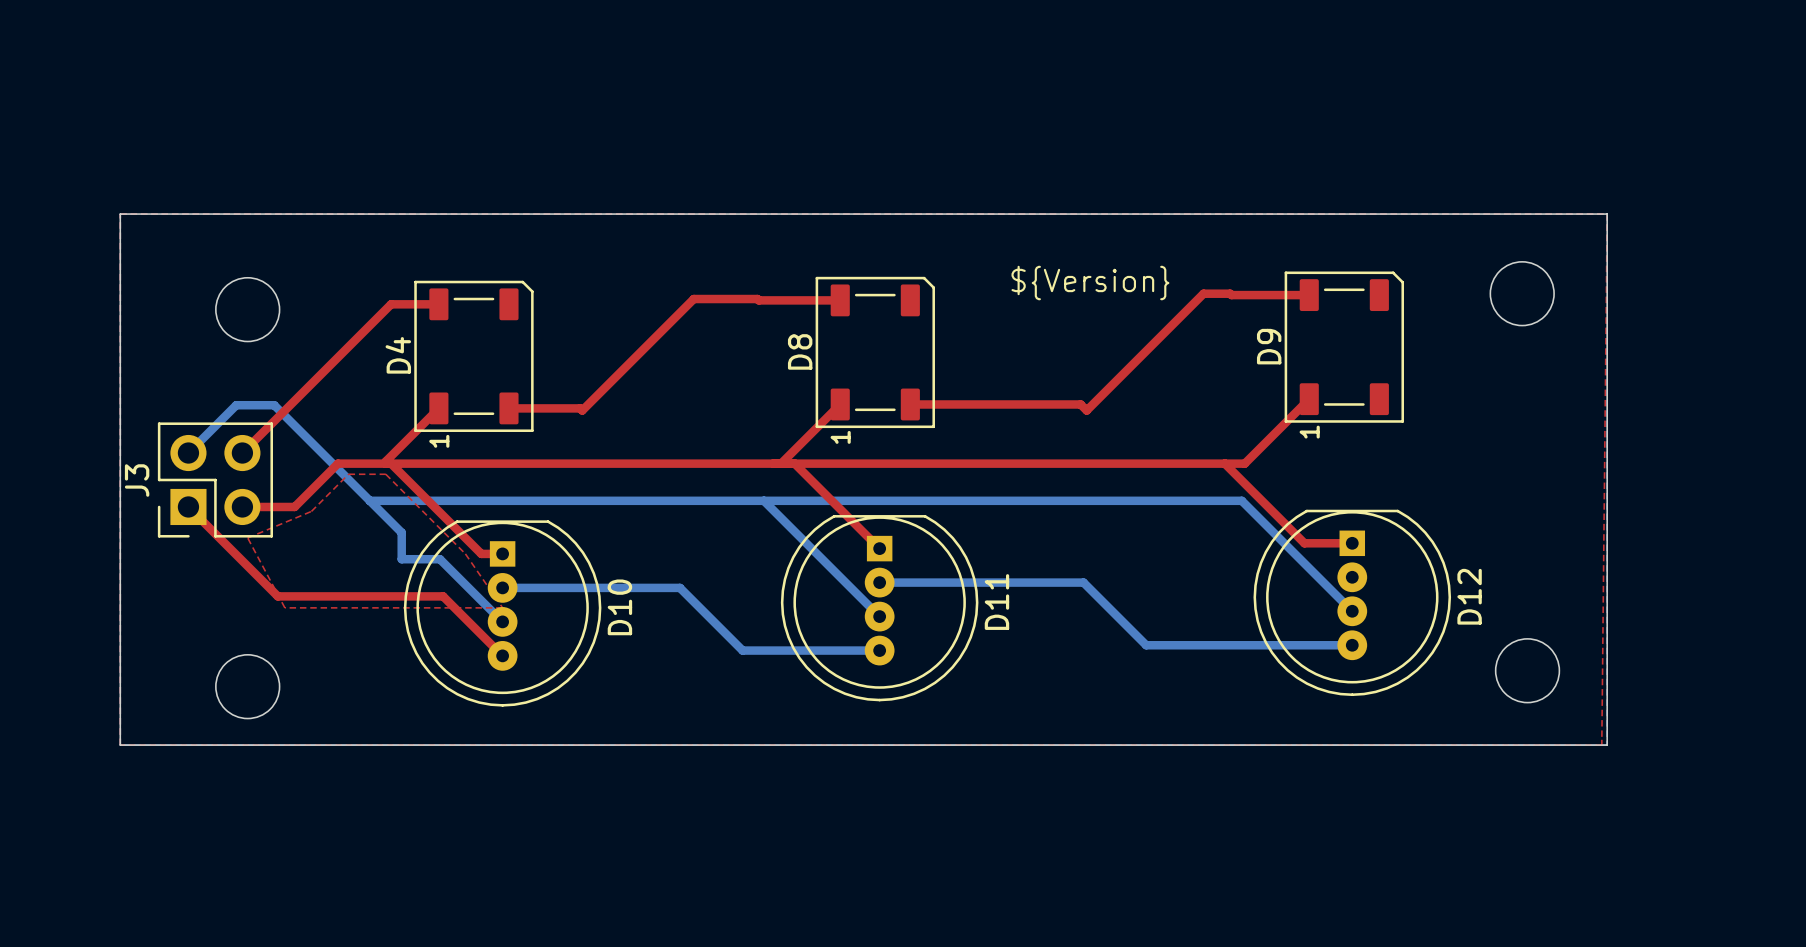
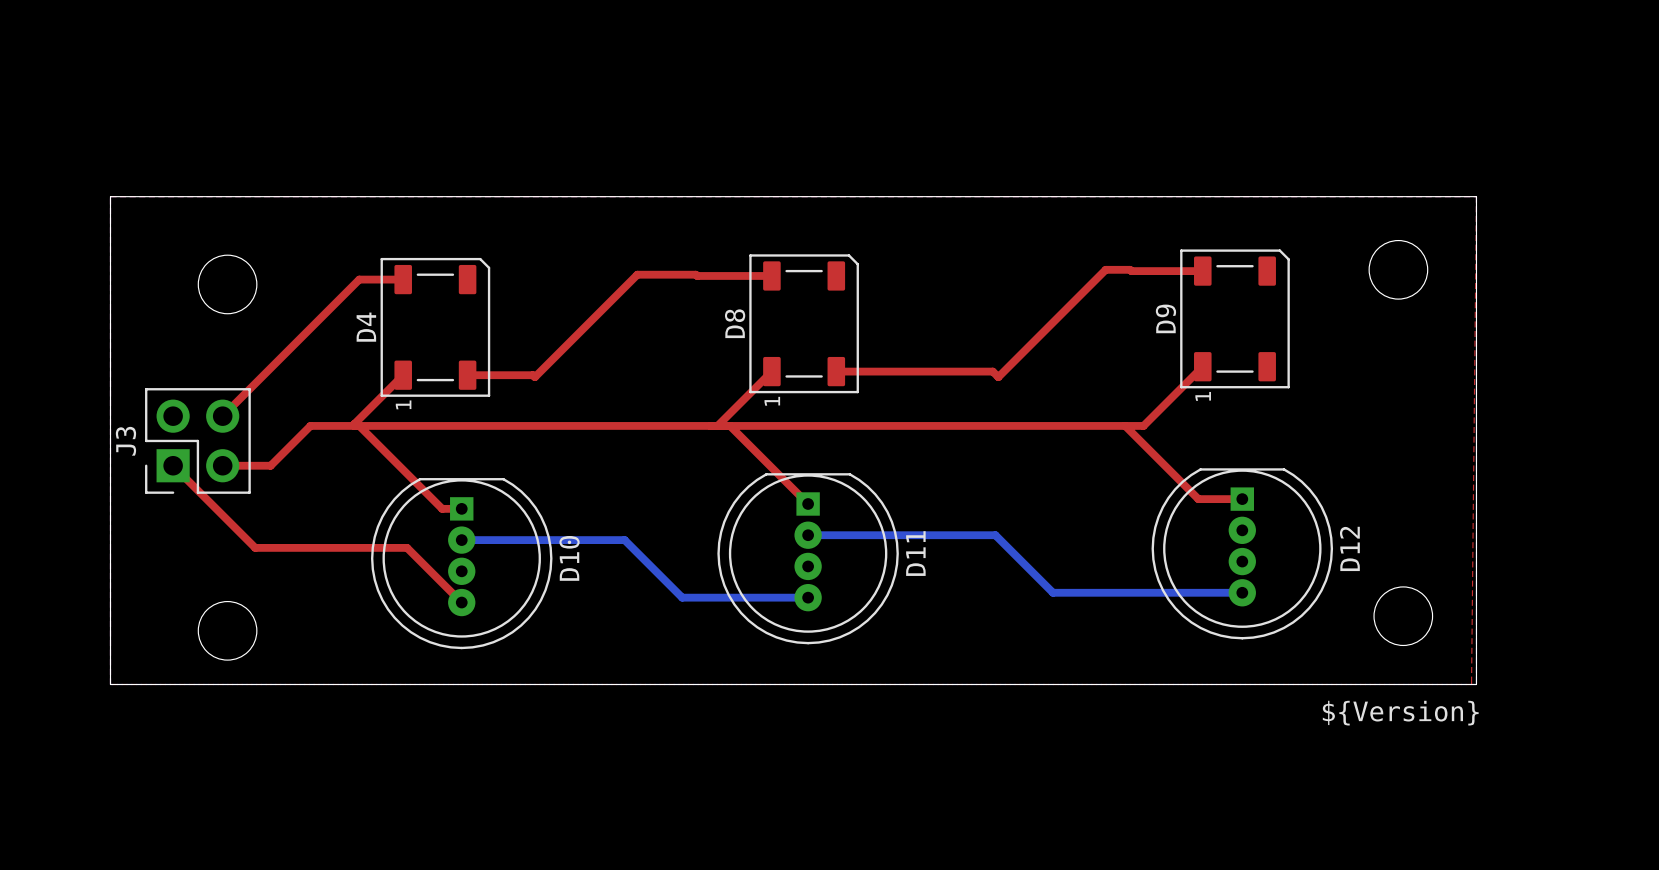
text: ${Version} (1090, 283) -> none
bottom track: (188, 453) (236, 405) (274, 405) (401, 532) (401, 559) (439, 559) (502, 621) -> none
top zone outline: (348, 474) (311, 511) (247, 537) (284, 607) (502, 607) (465, 553) (385, 474) (348, 474) -> none
bottom track: (369, 500) (1241, 500) (1352, 611) -> none
bottom track: (763, 500) (879, 616) -> none
text: none -> ${Version} (1400, 713)

